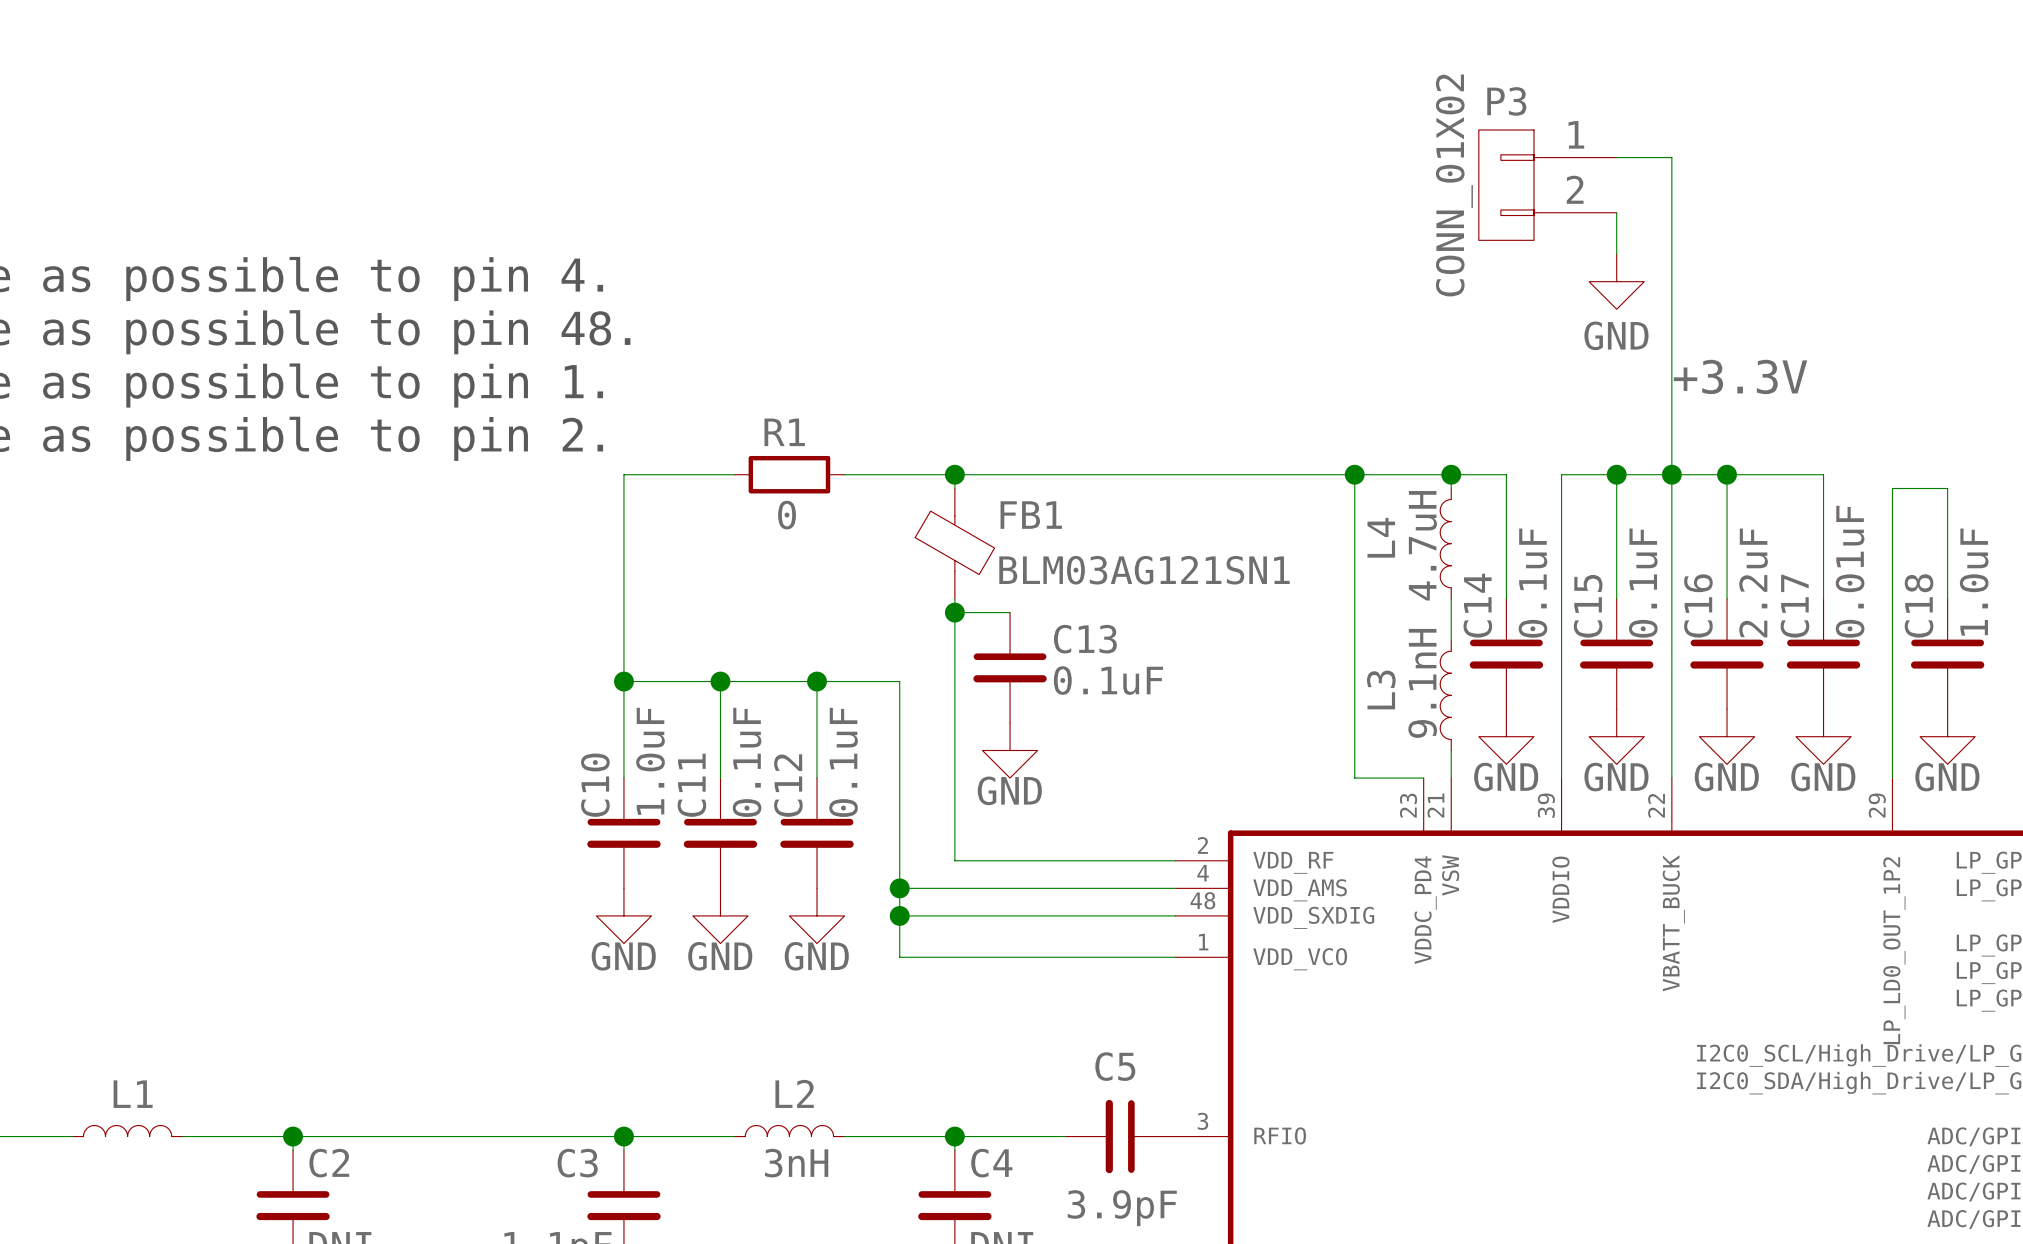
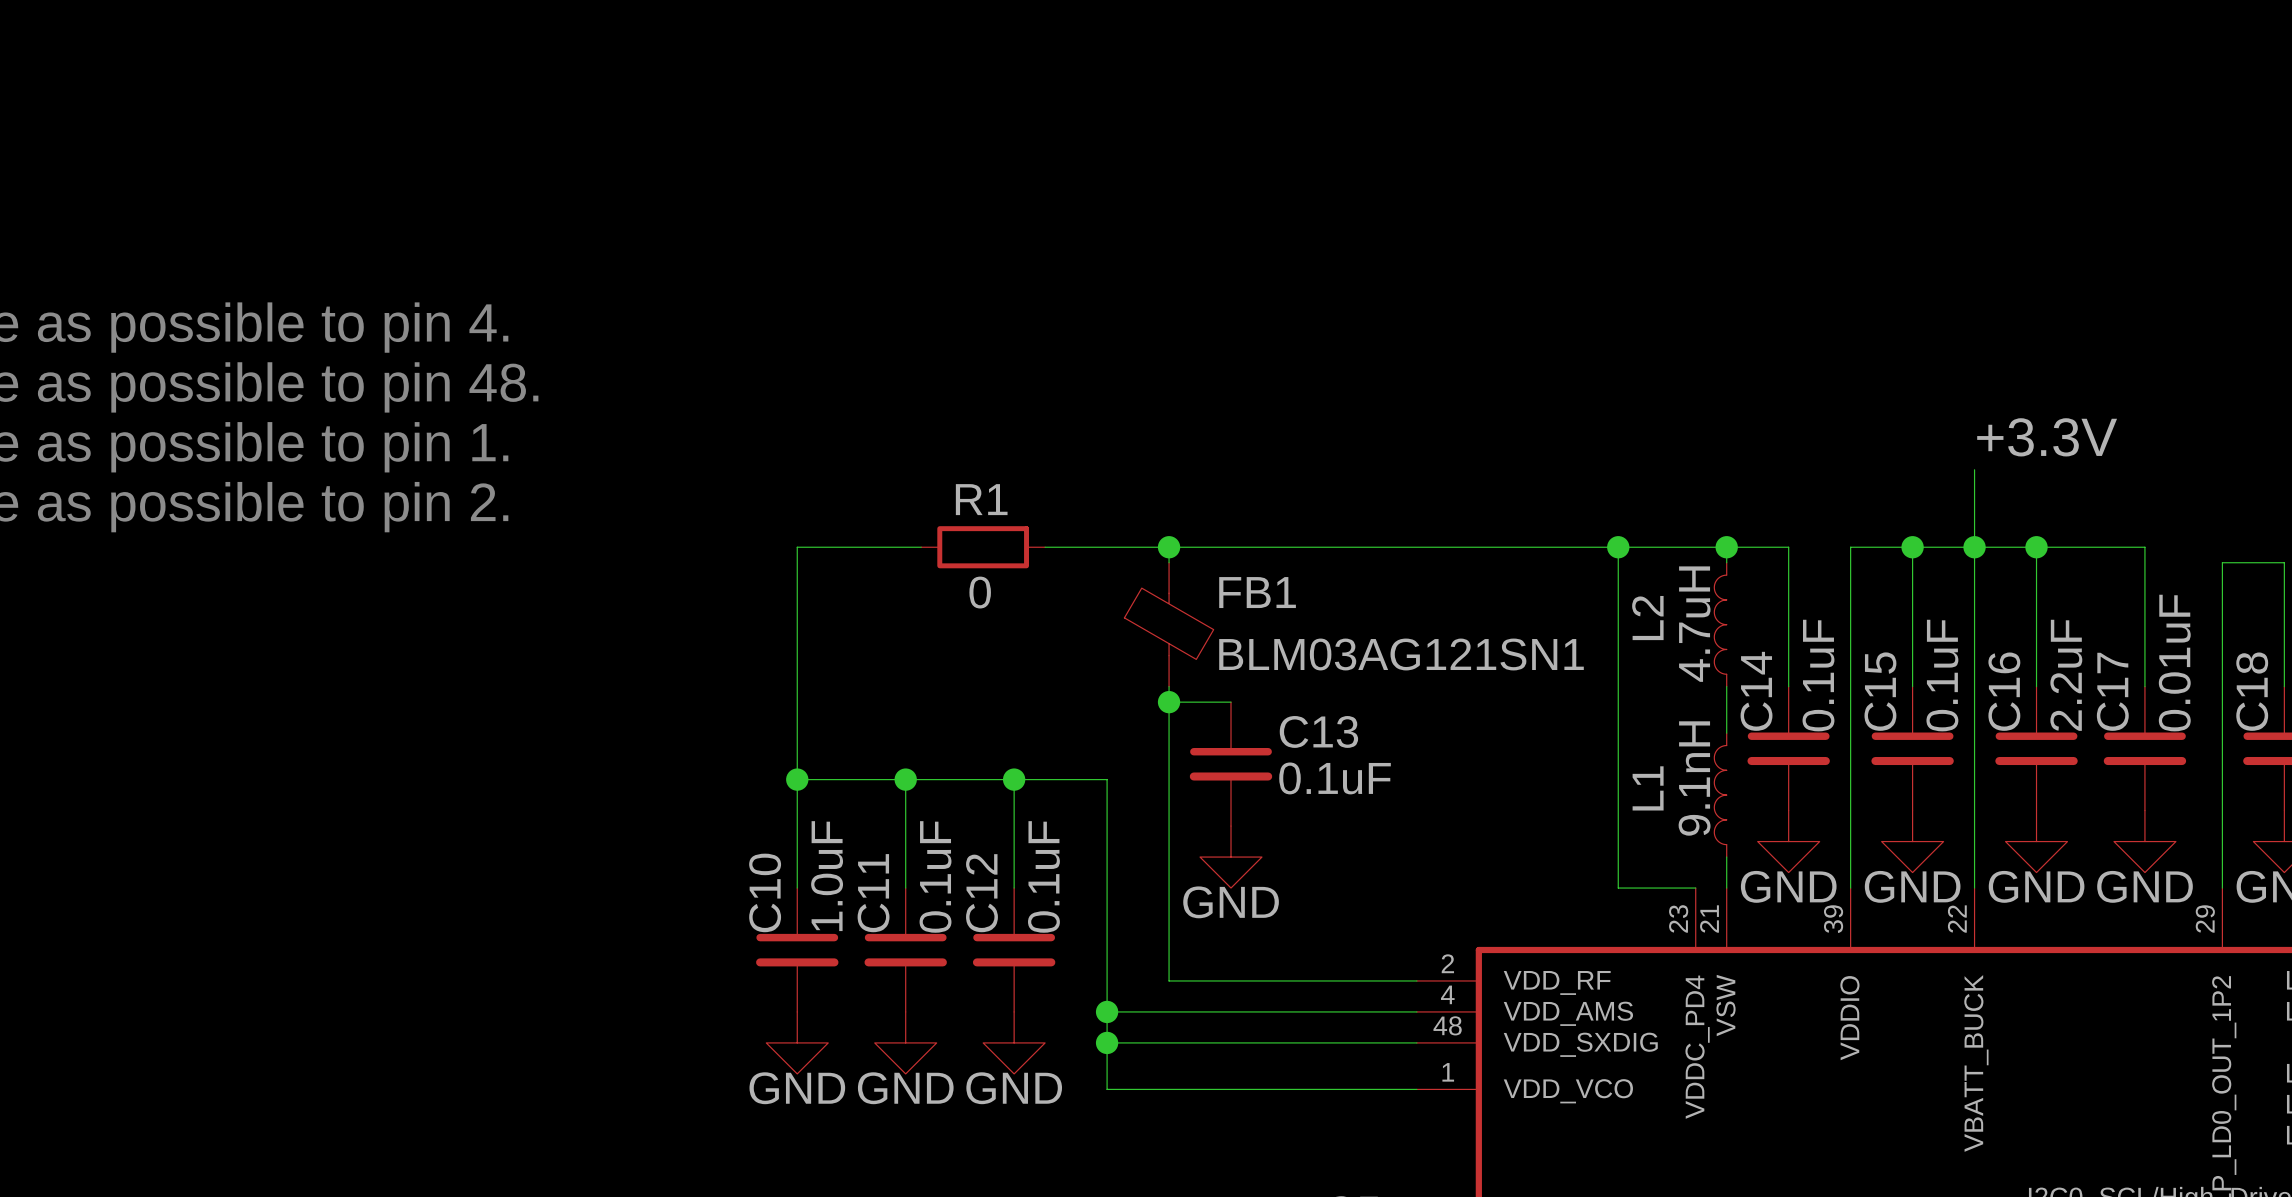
wire: (1616, 157) (1671, 157) (1671, 405) -> none
P3: CONN_01X02 (1547, 185) -> none
wire: (1616, 212) (1616, 254) -> none
power symbol: GND (1616, 281) -> none
L4 name: L4 (1381, 537) -> L2 (1647, 618)
L3 name: L3 (1381, 689) -> L1 (1648, 788)

